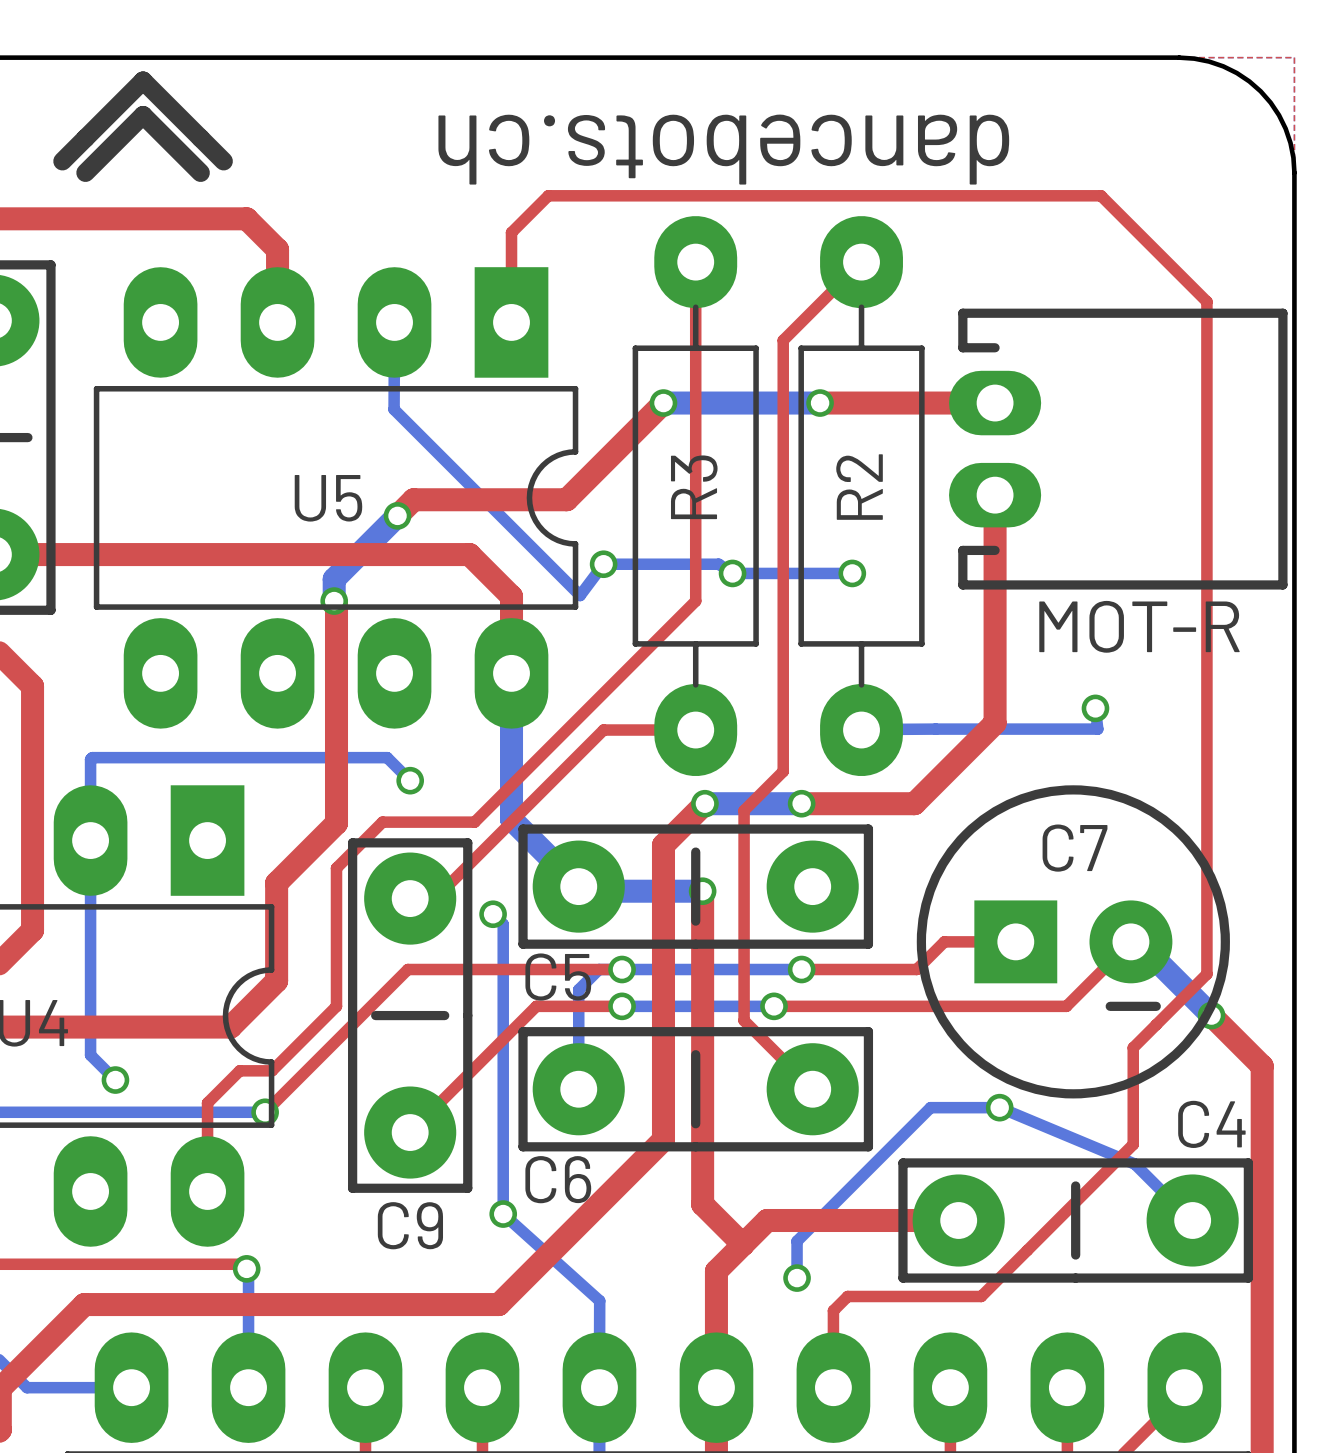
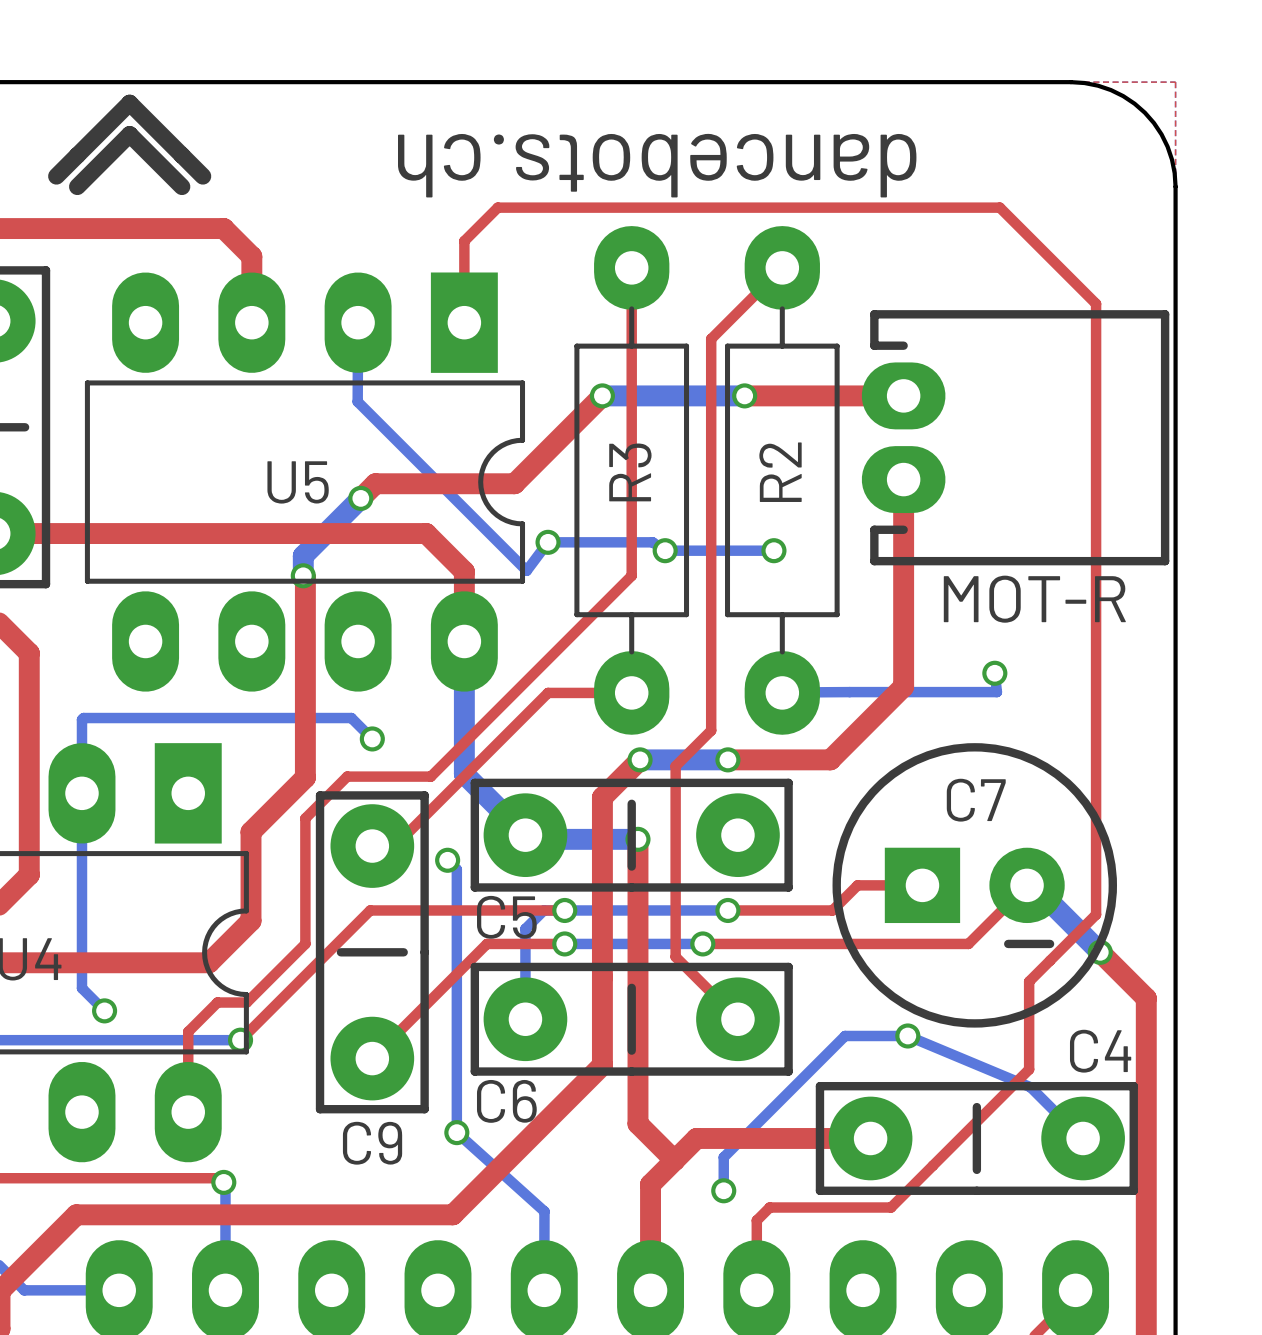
part footprint: [949, 308, 1288, 590] -> [861, 310, 1170, 566]

